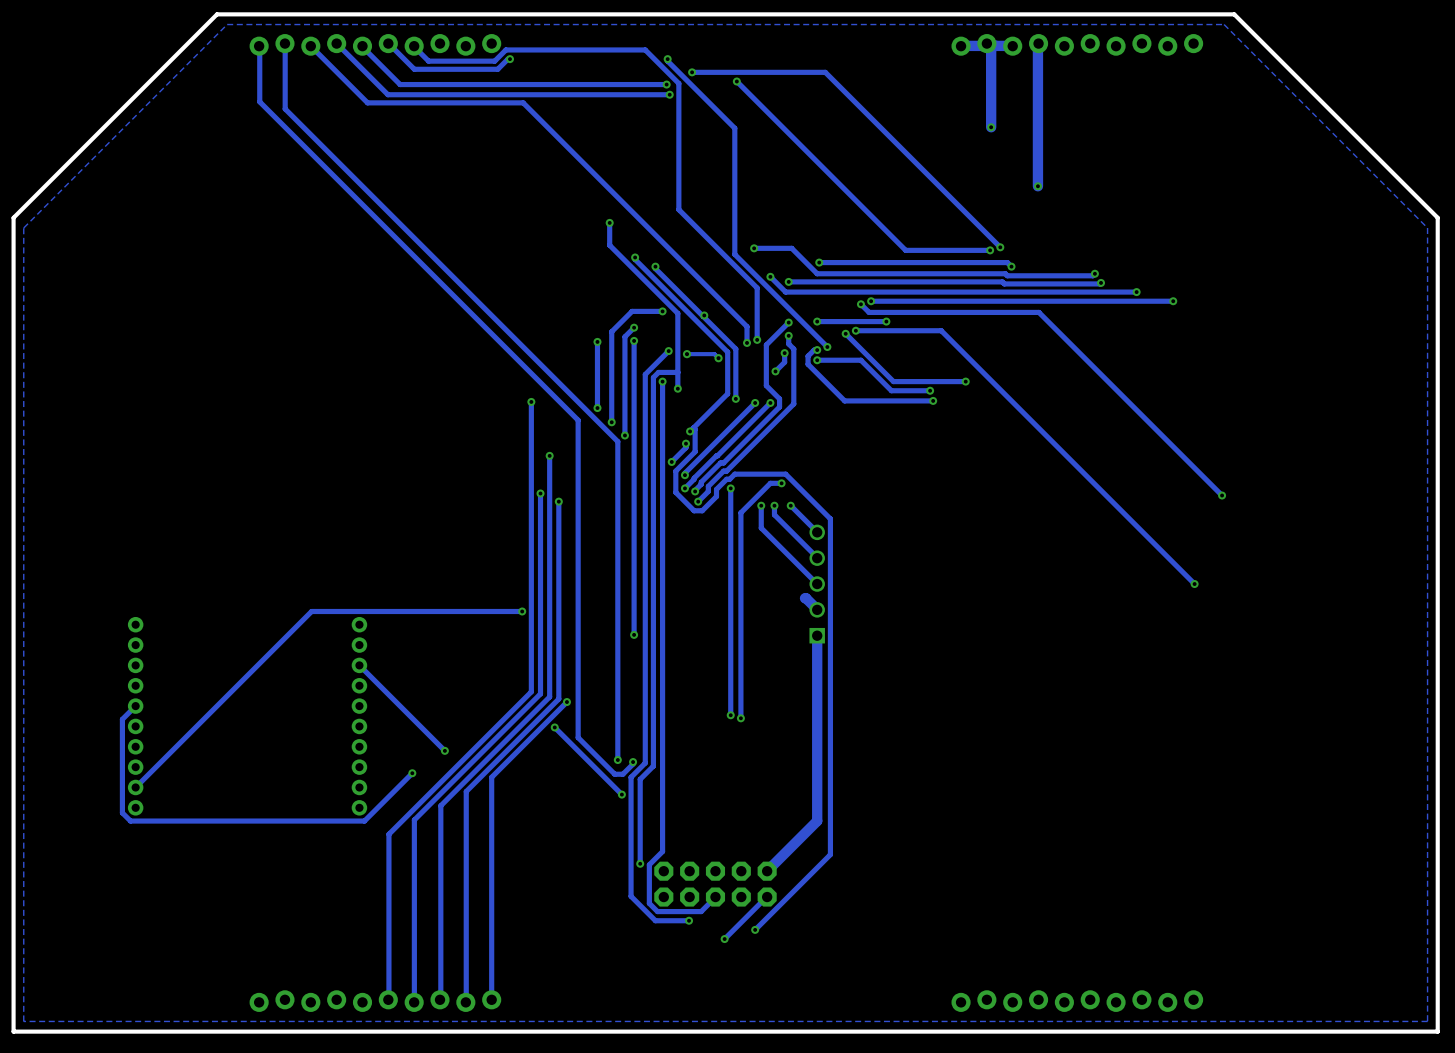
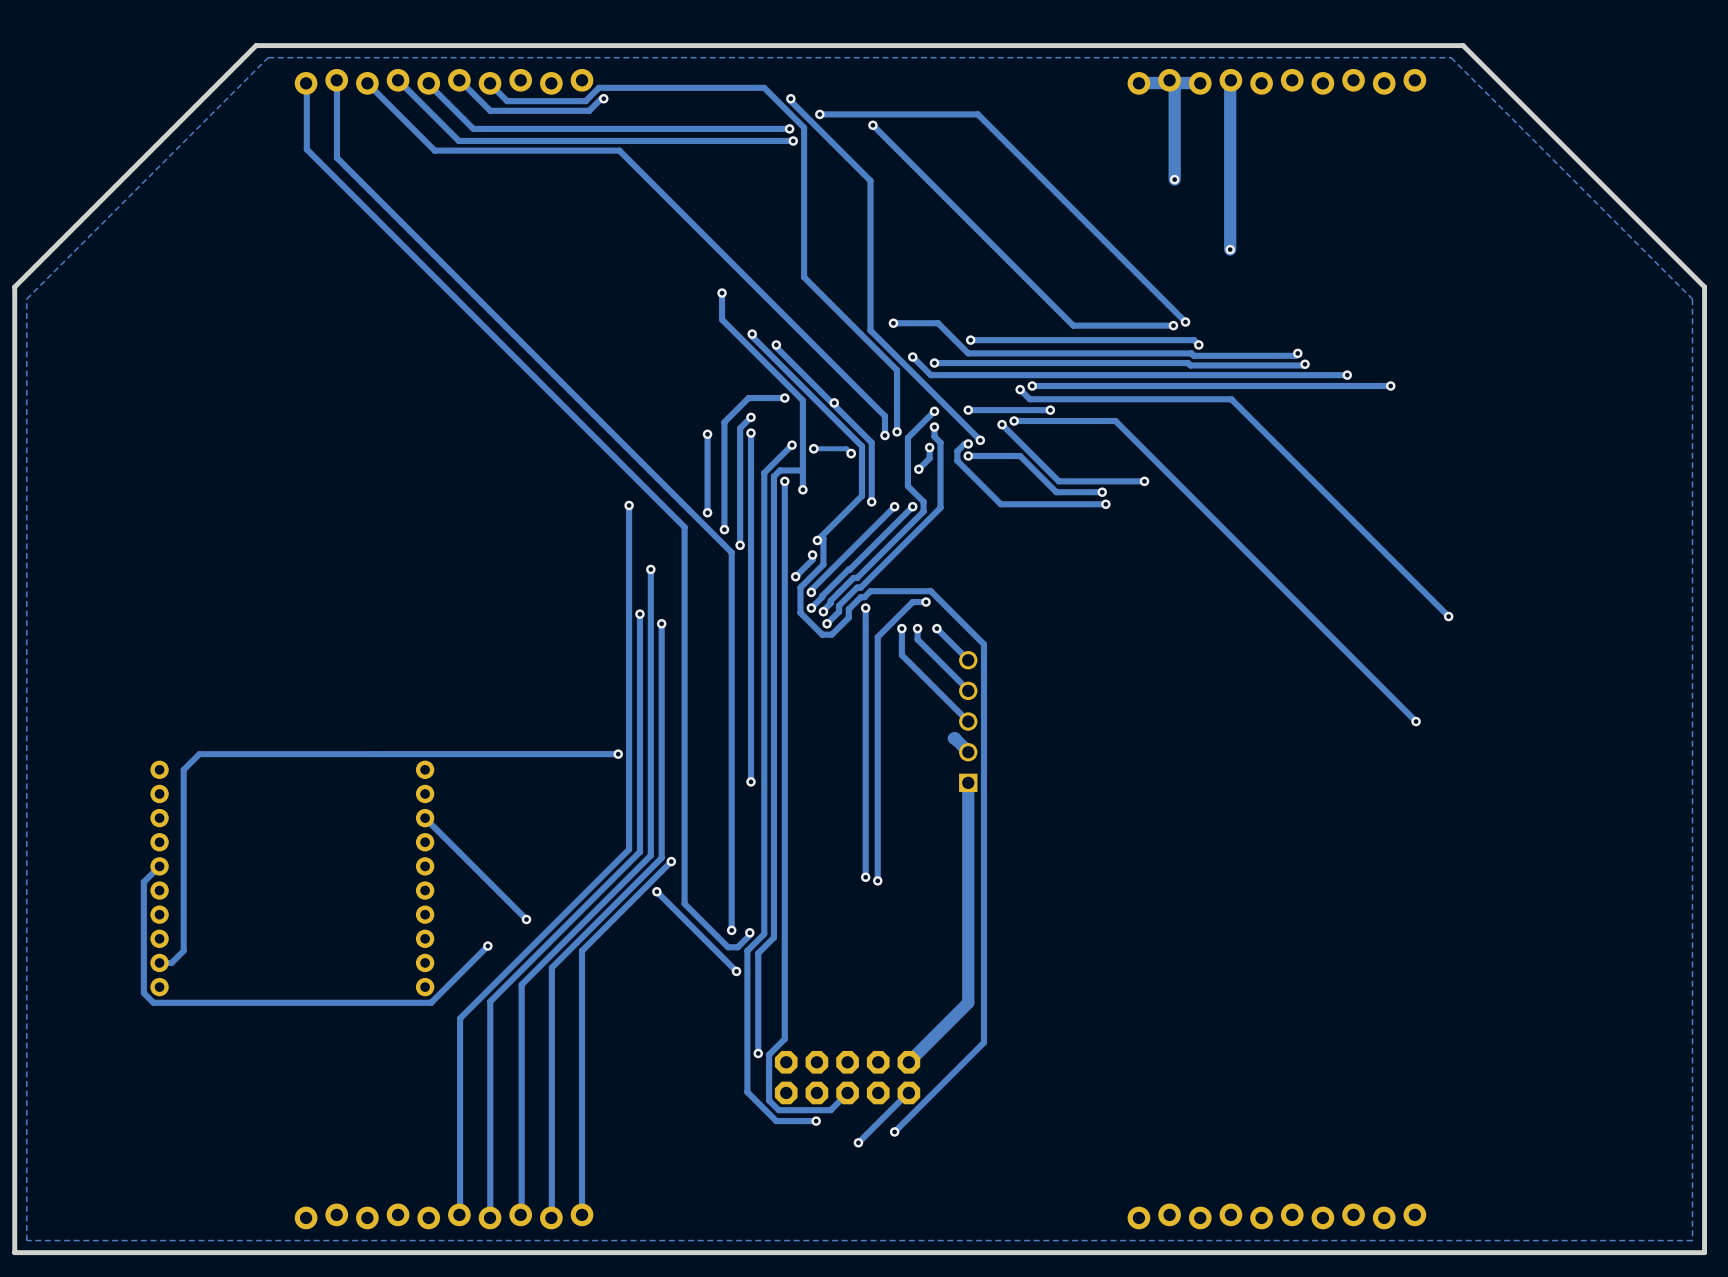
track: (311, 611) (135, 787) -> (368, 754) (199, 754) (183, 769) (183, 950) (171, 962) (159, 962)

